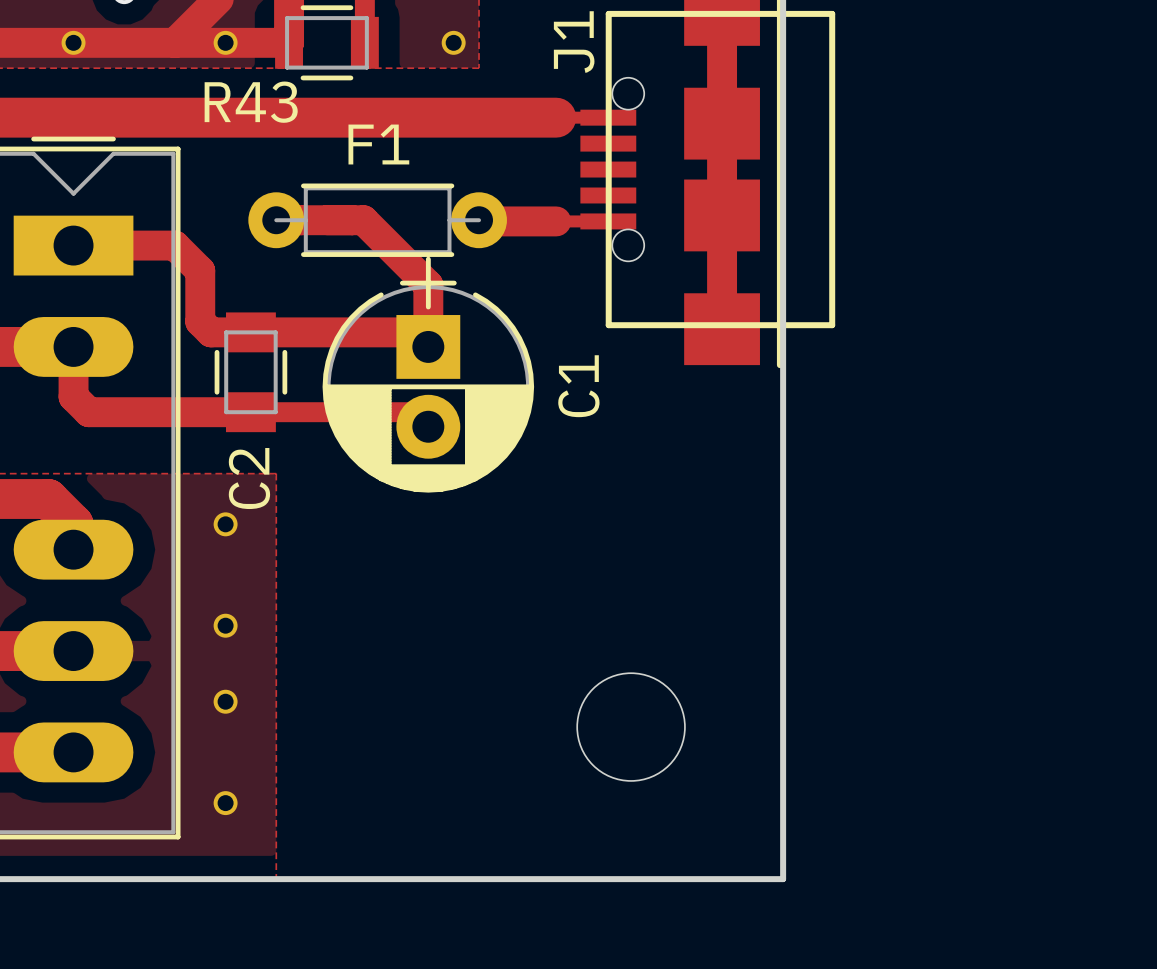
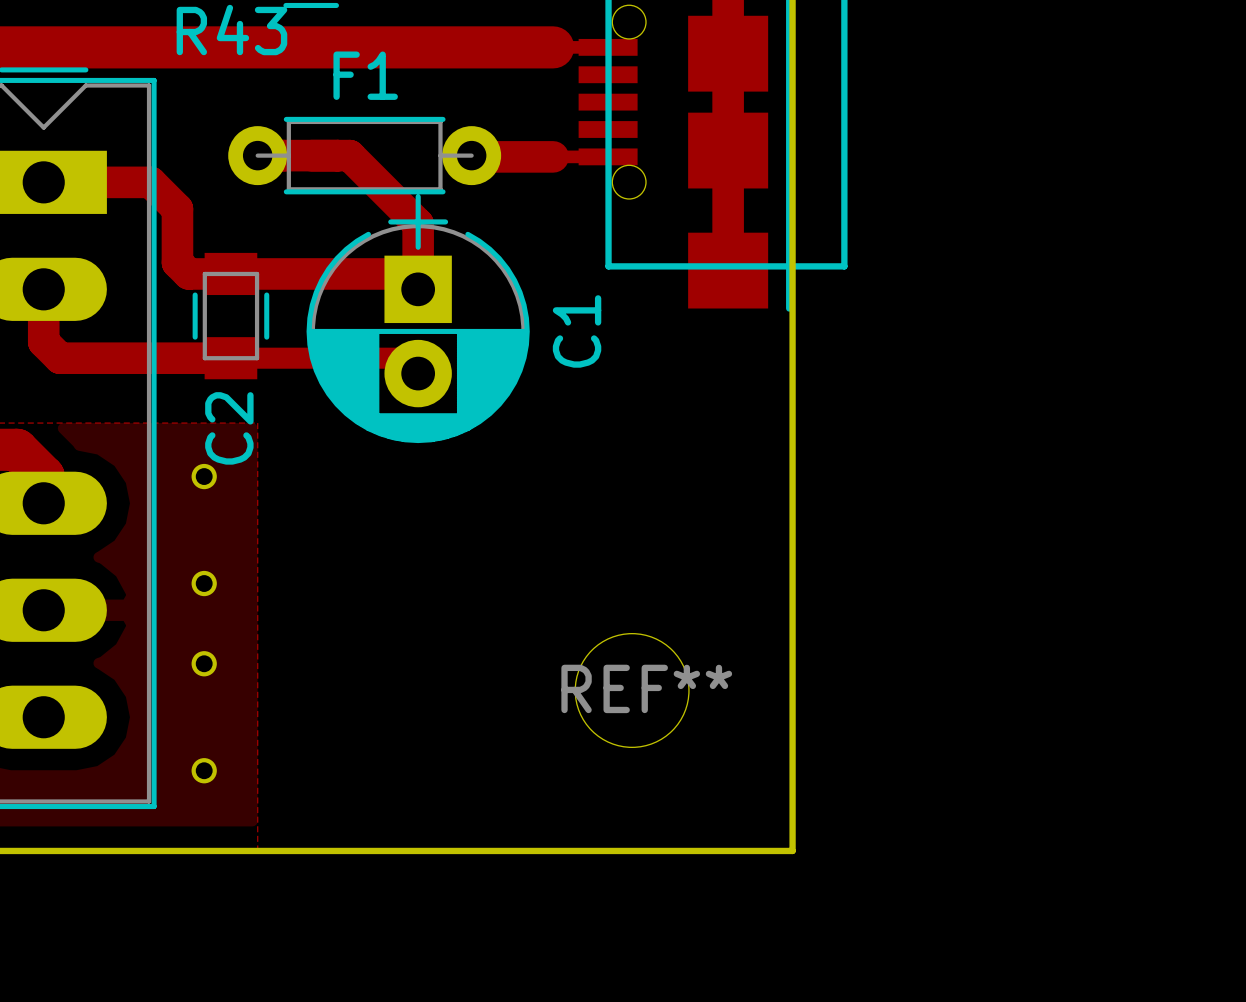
REF** name: none -> REF** (646, 688)

